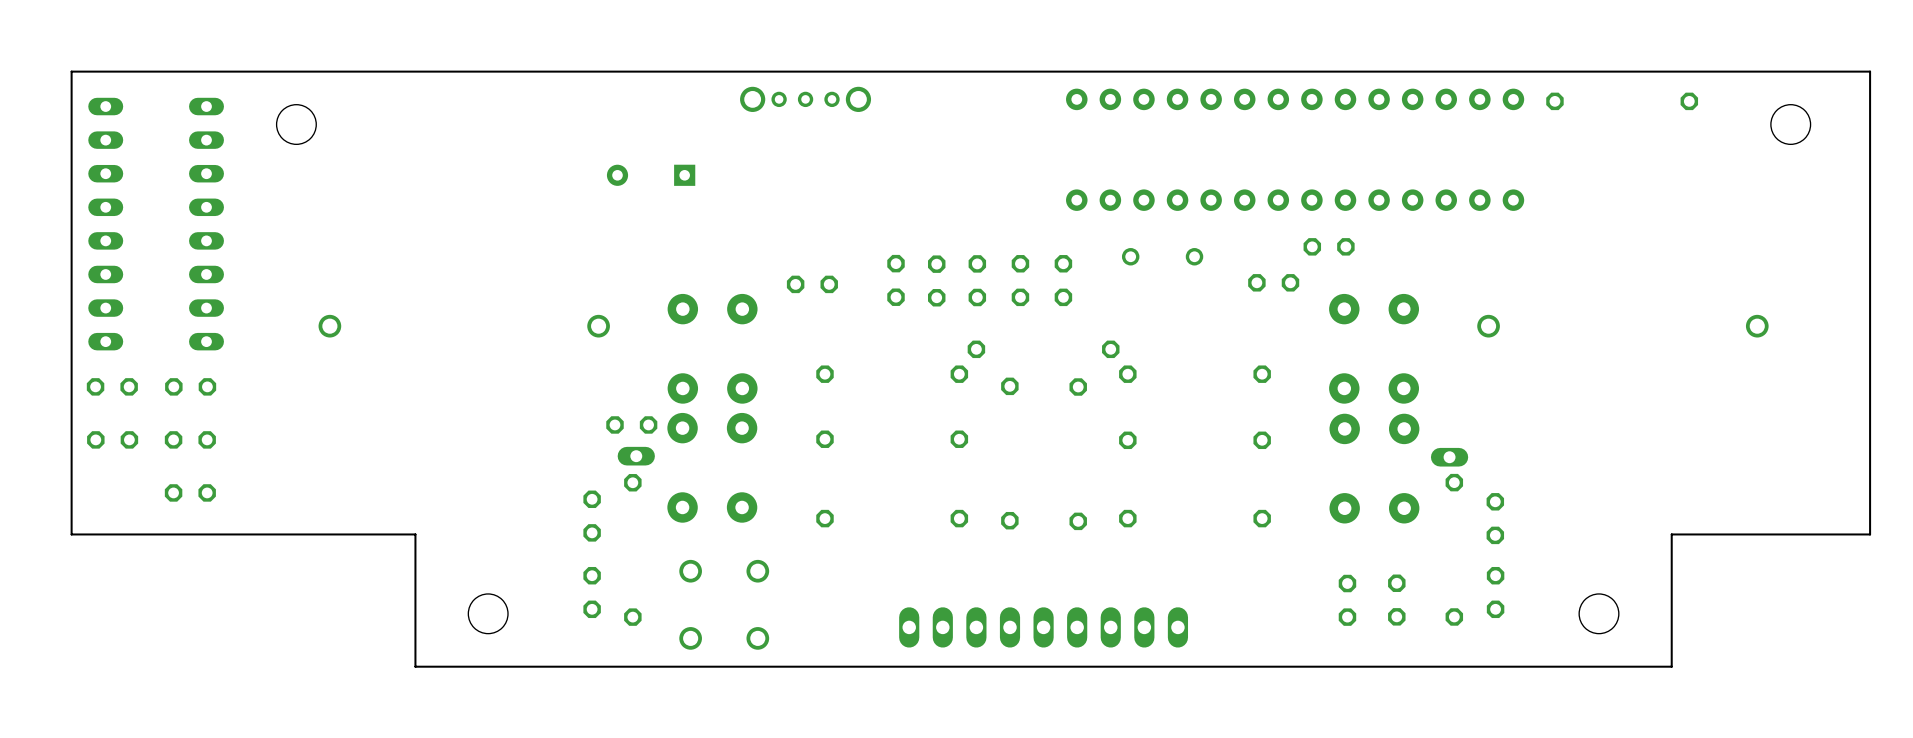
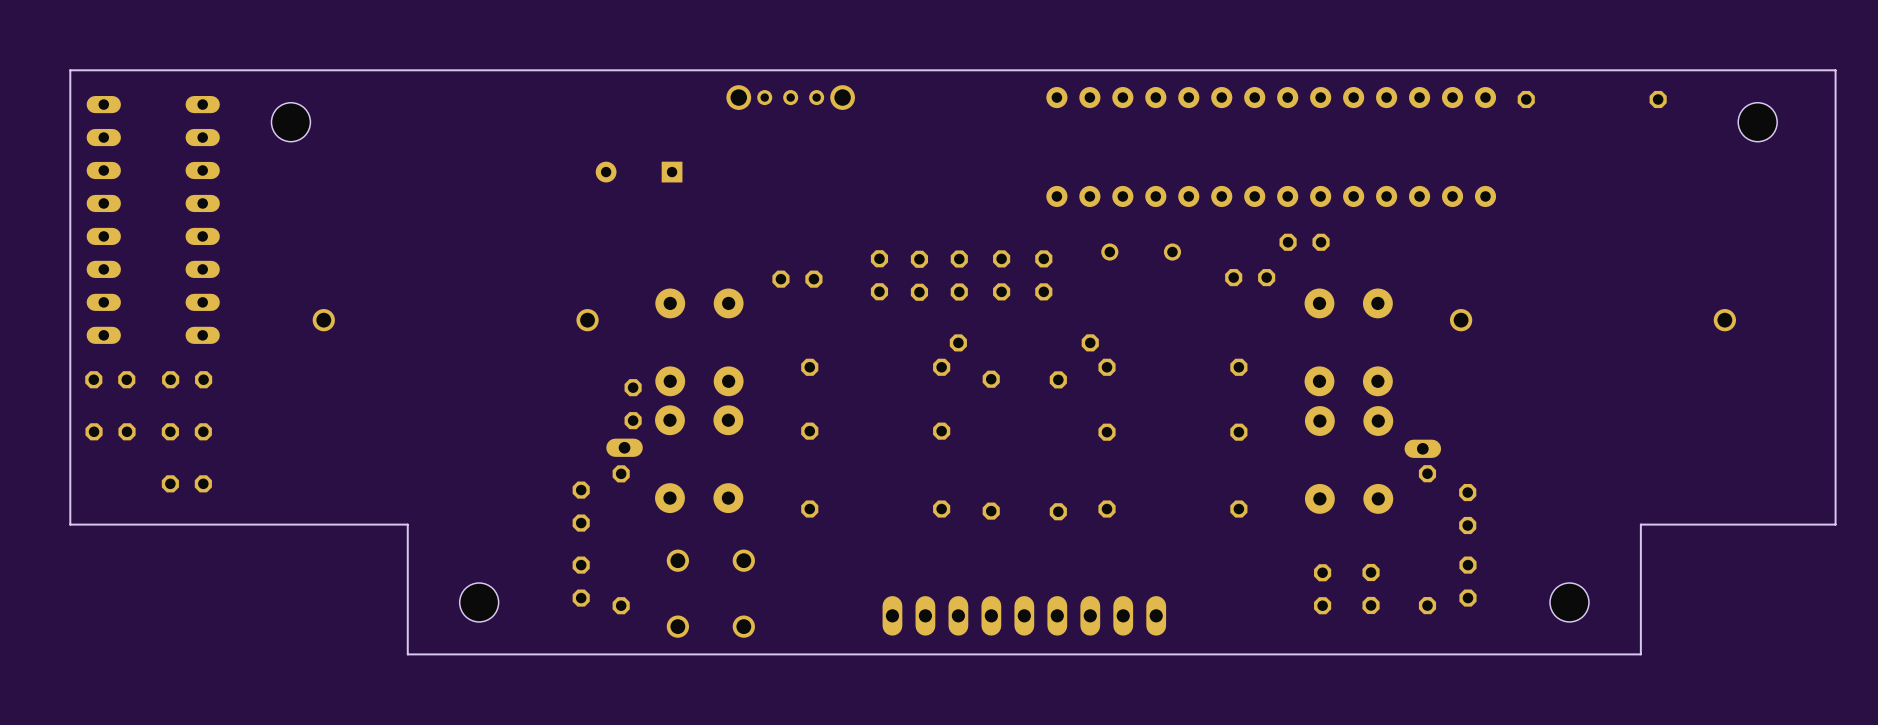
part rotation: 0° (631, 424) -> 90° clockwise (633, 404)

